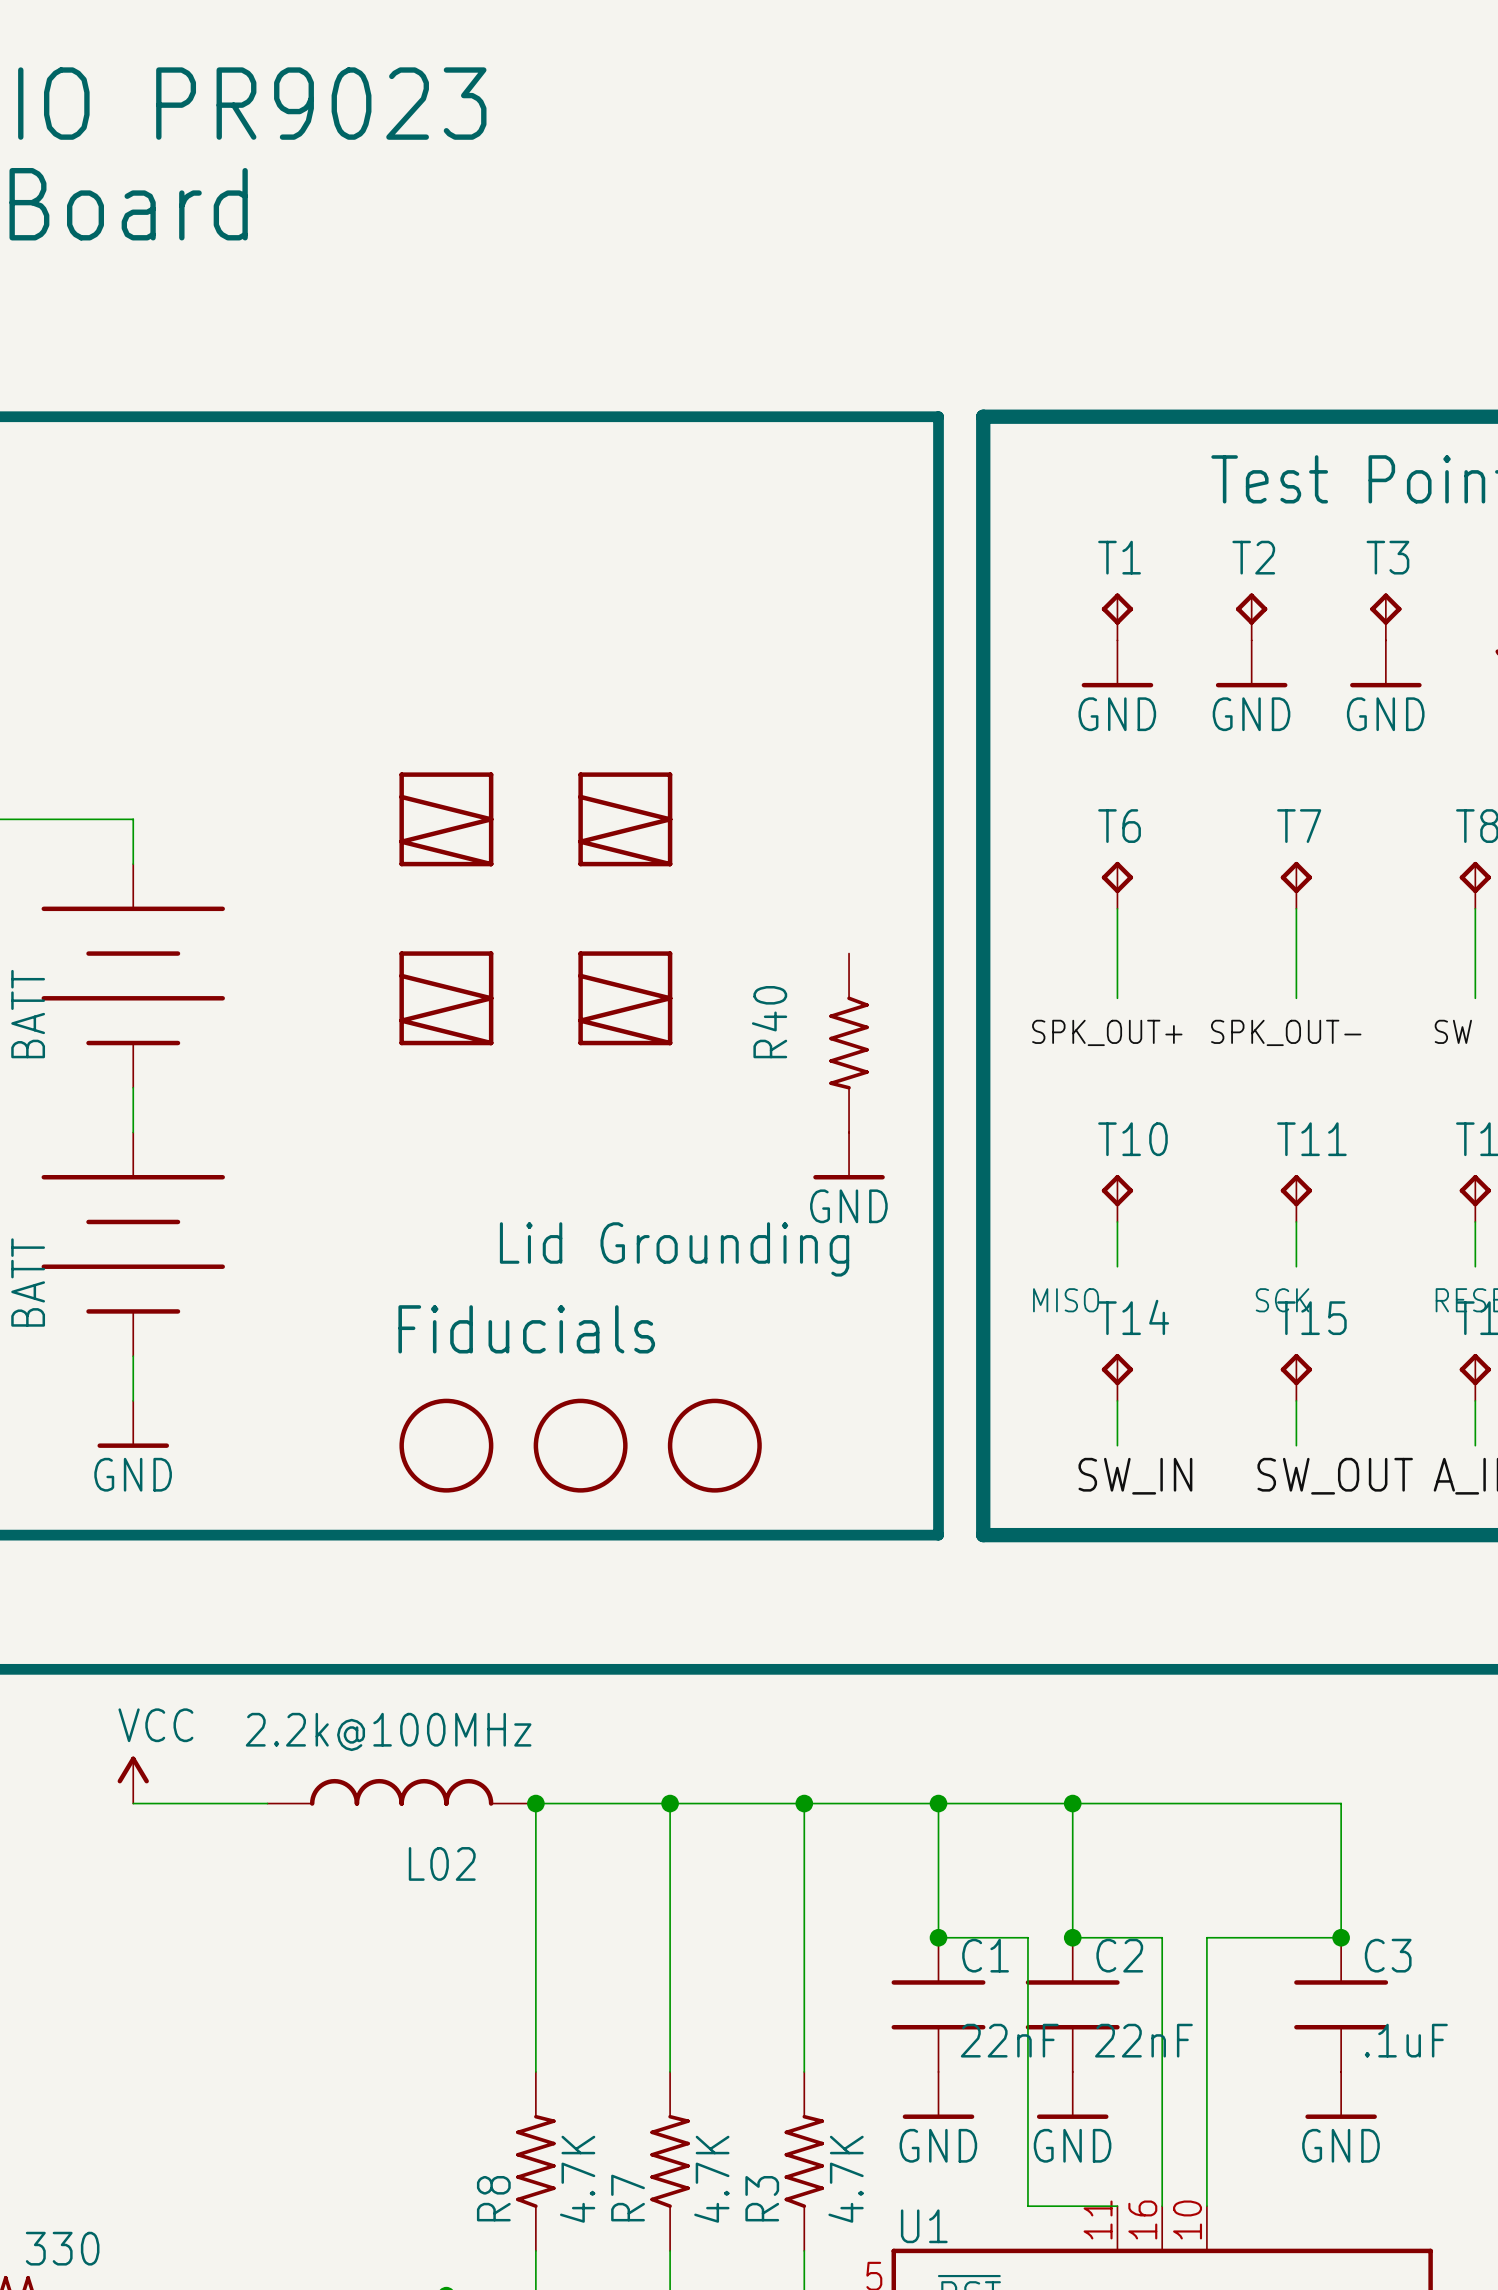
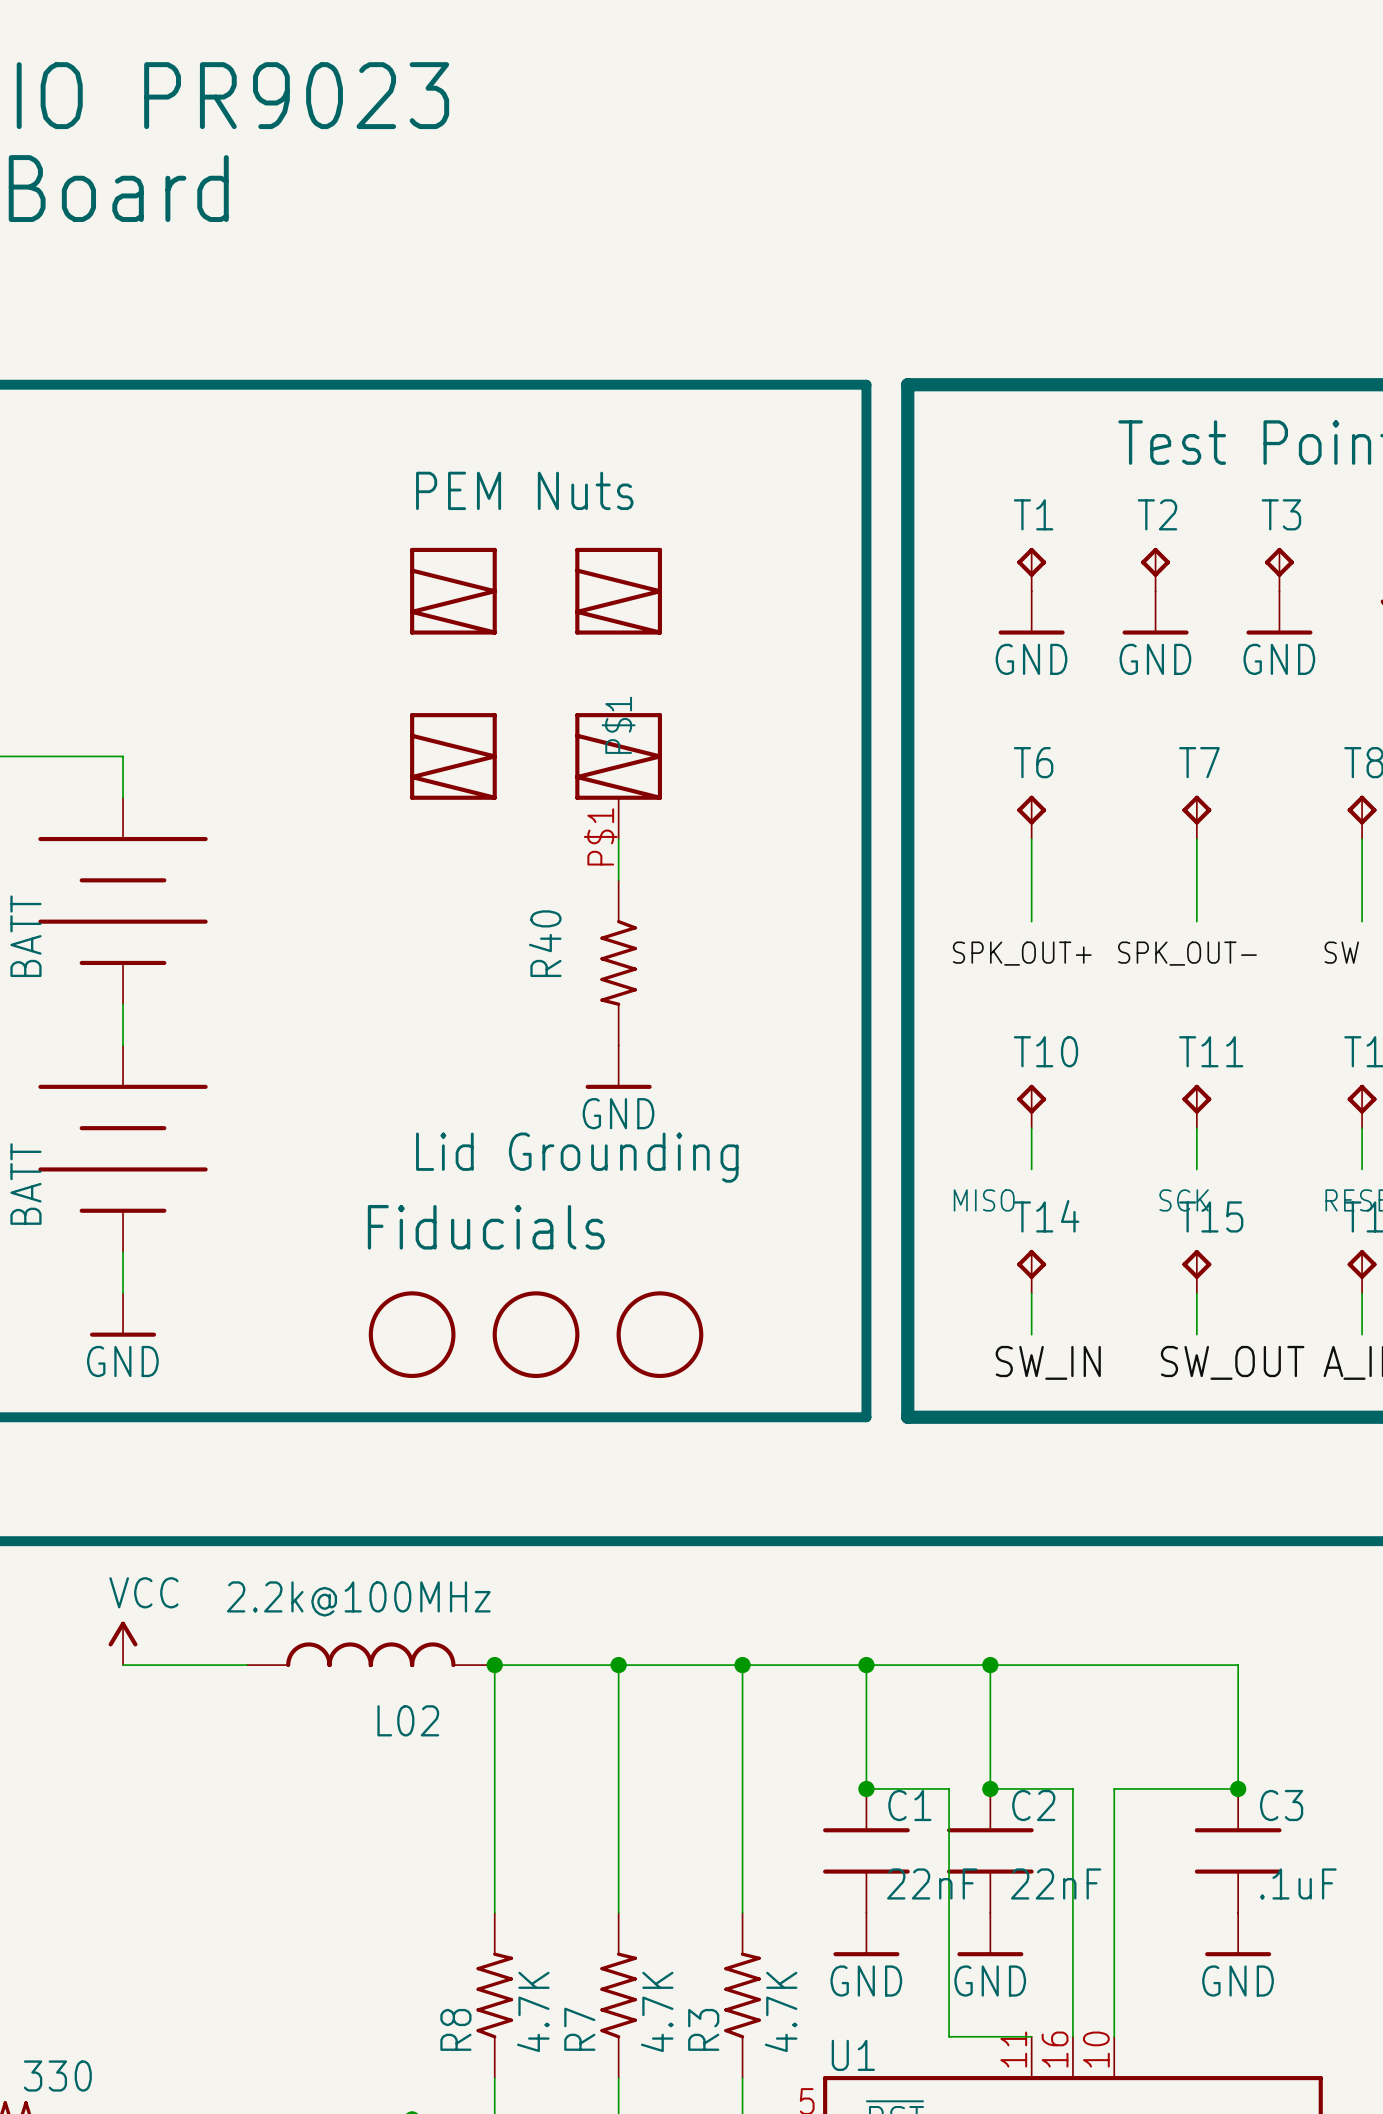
text: none -> PEM Nuts (524, 490)
part: none -> (453, 591)
part: none -> (618, 591)
part position: (446, 819) -> (453, 756)
part: (625, 819) -> none
part: none -> (618, 776)
wire: none -> (618, 839) (618, 880)
part: (446, 998) -> none
part: (625, 998) -> none
R40 position: (849, 1043) -> (618, 962)
power symbol position: GND (849, 1155) -> GND (618, 1067)
text position: Lid Grounding (674, 1249) -> Lid Grounding (577, 1157)

